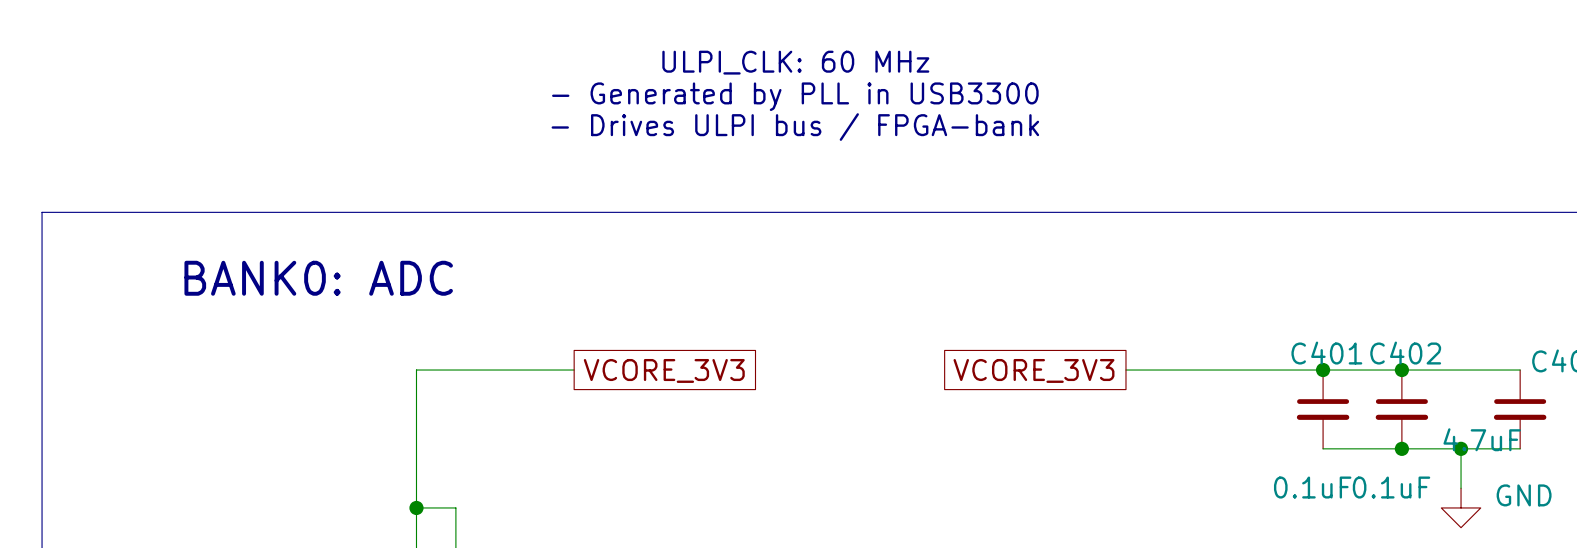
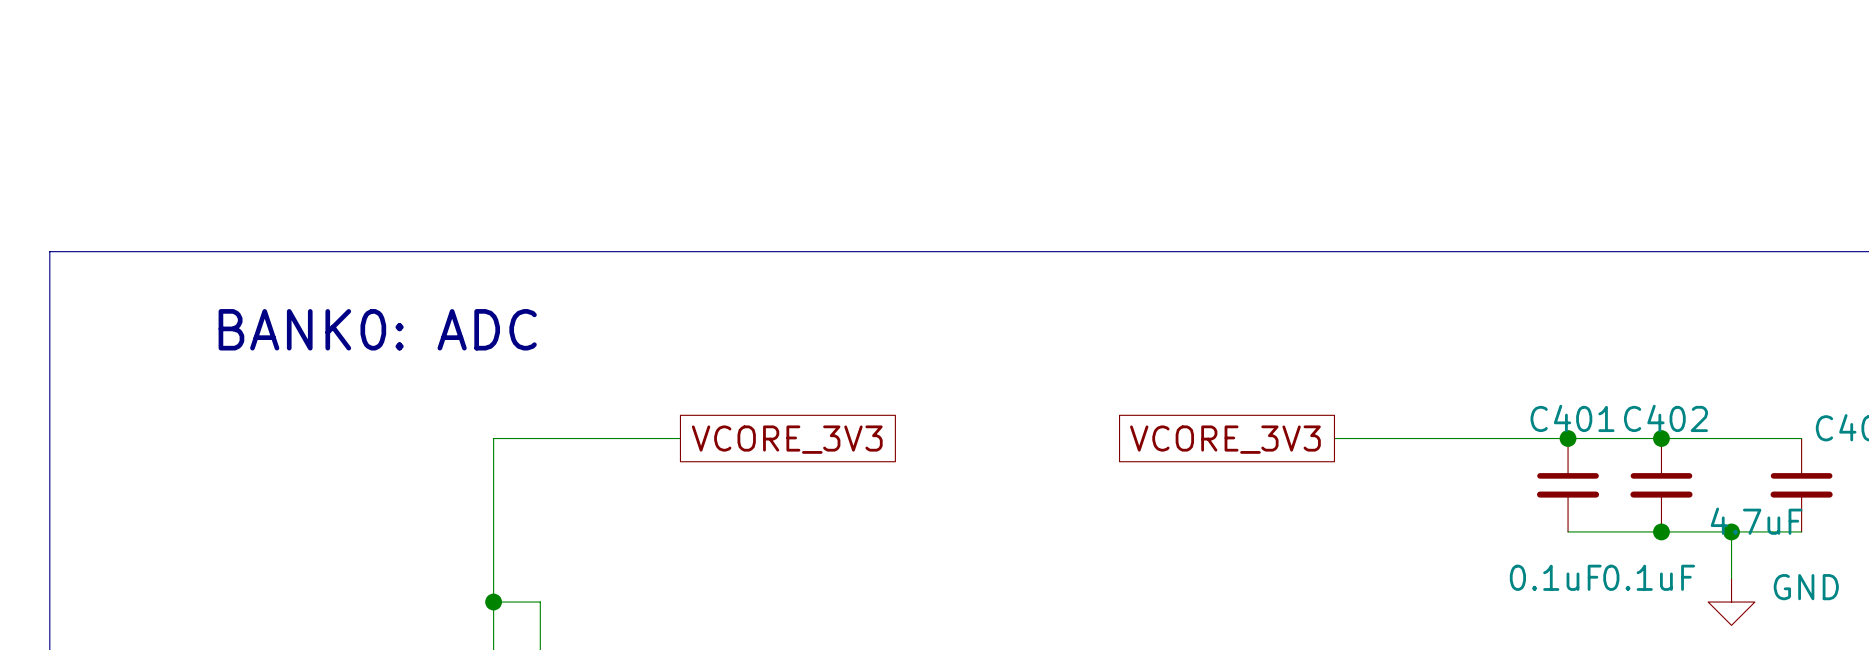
text: ULPI_CLK: 60 MHz (795, 62) -> none
text: - Generated by PLL in USB3300 (795, 96) -> none
text: - Drives ULPI bus / FPGA-bank (795, 127) -> none

